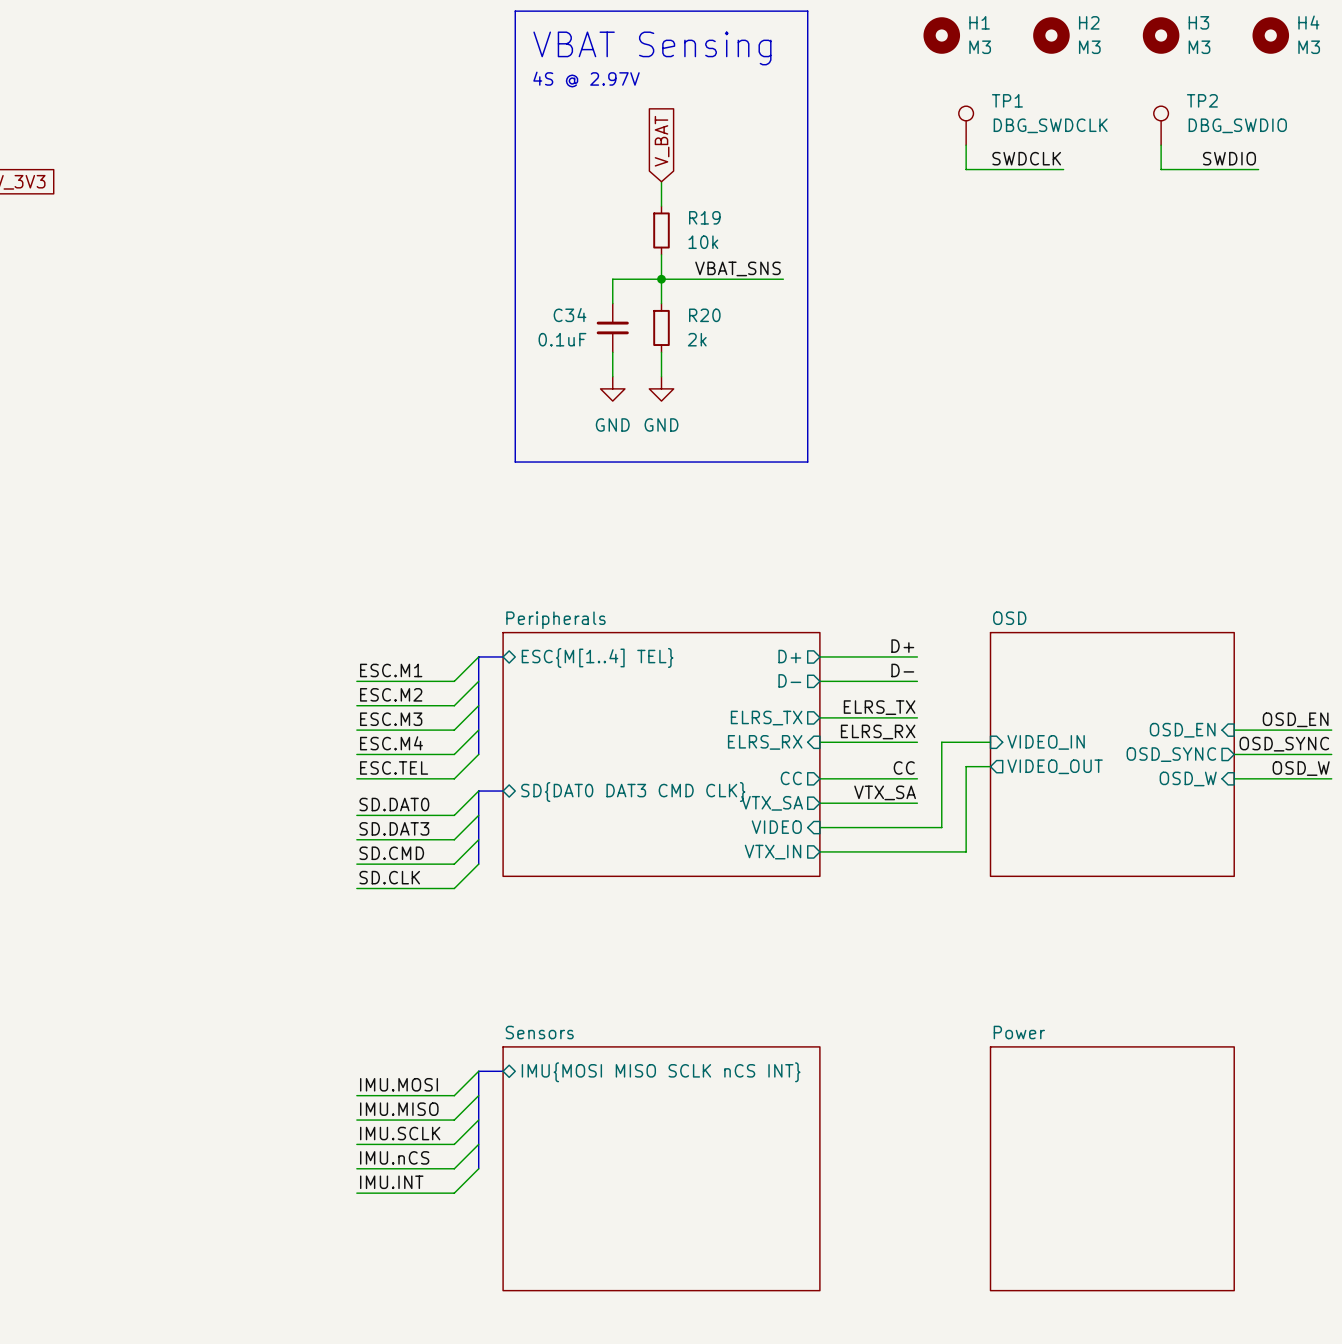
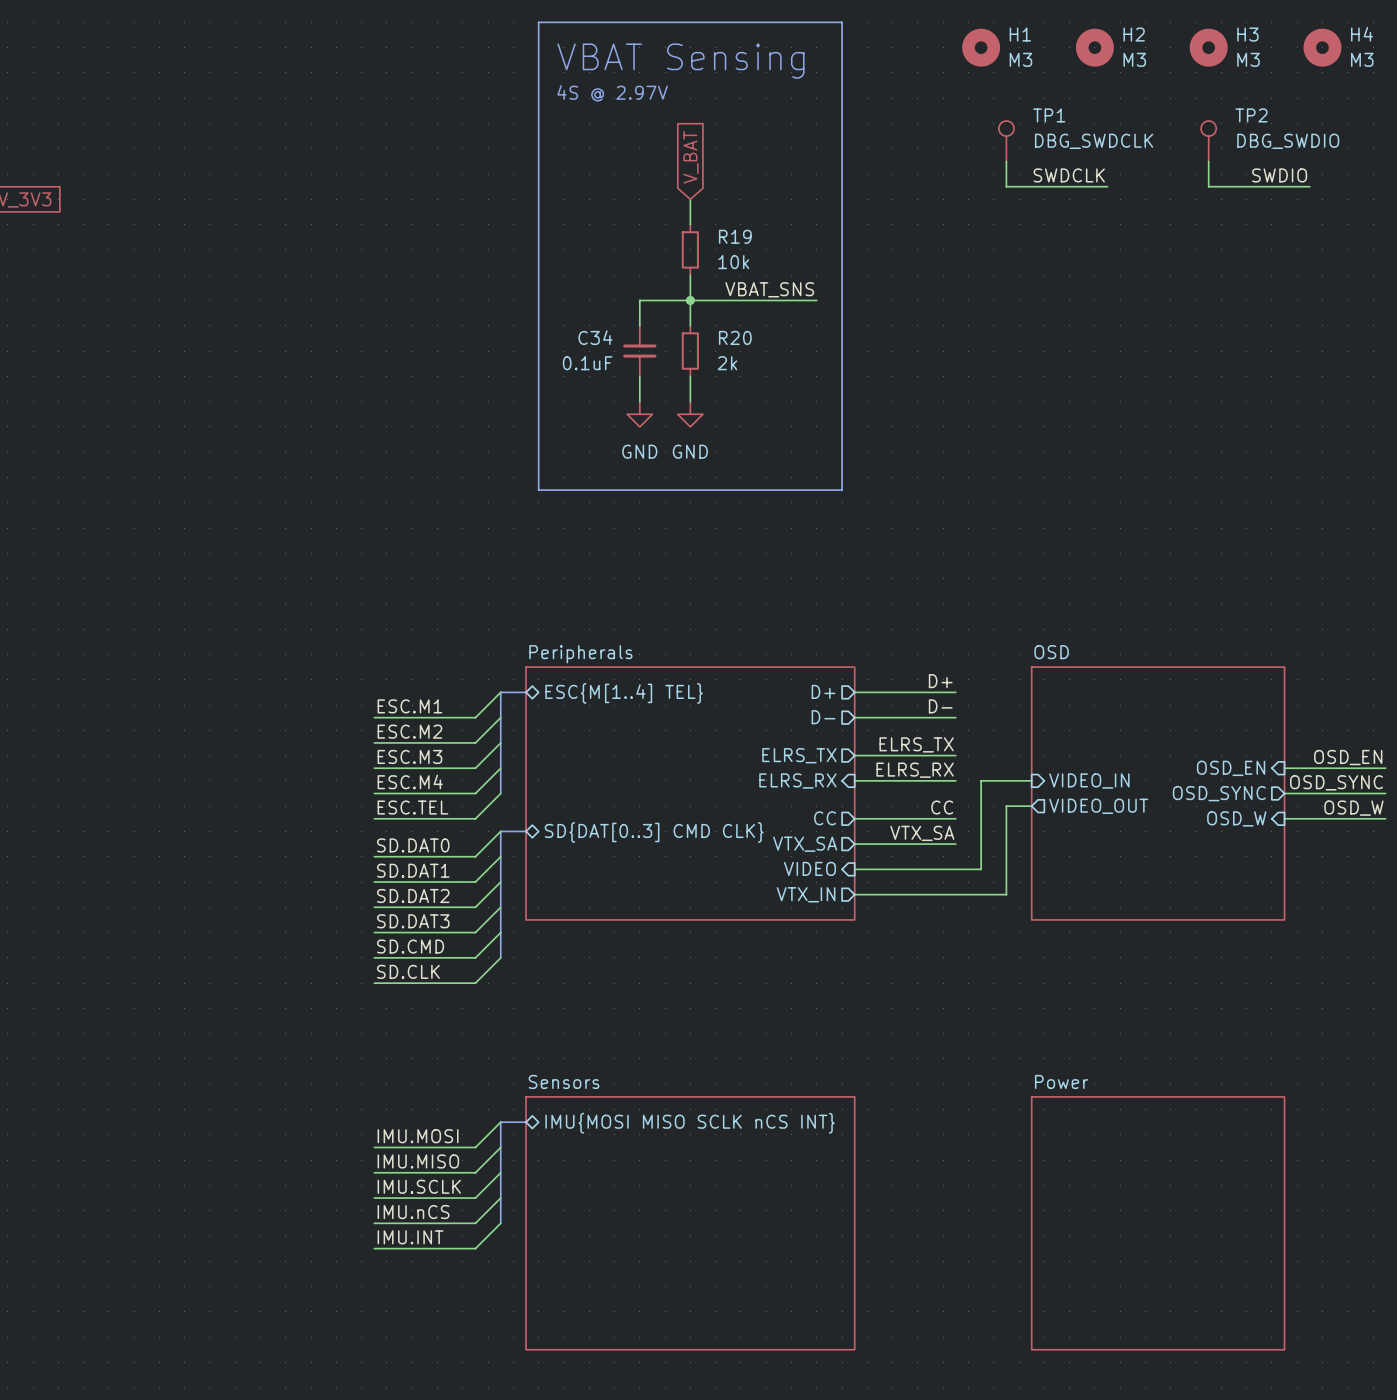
sheet pin: SD{DAT0 DAT3 CMD CLK} (633, 792) -> SD{DAT[0..3] CMD CLK} (654, 832)
label: SD.DAT3 (394, 828) -> SD.DAT1 (413, 870)
label: SD.CMD (391, 853) -> SD.DAT2 (413, 896)
bus: none -> (500, 907) (500, 957)
label: SD.CLK (389, 877) -> SD.DAT3 (413, 921)
wire: none -> (500, 932) (475, 957) (374, 957)
label: none -> SD.CMD (410, 946)
wire: none -> (500, 957) (475, 983) (374, 983)
label: none -> SD.CLK (408, 971)

